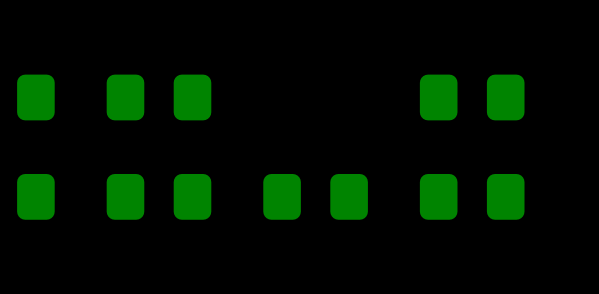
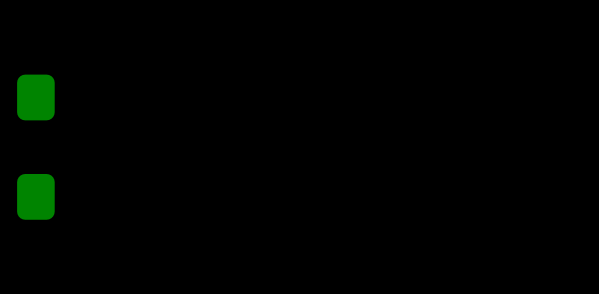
part: (158, 97) -> none
part: (472, 97) -> none
part: (158, 196) -> none
part: (315, 196) -> none
part: (472, 196) -> none

